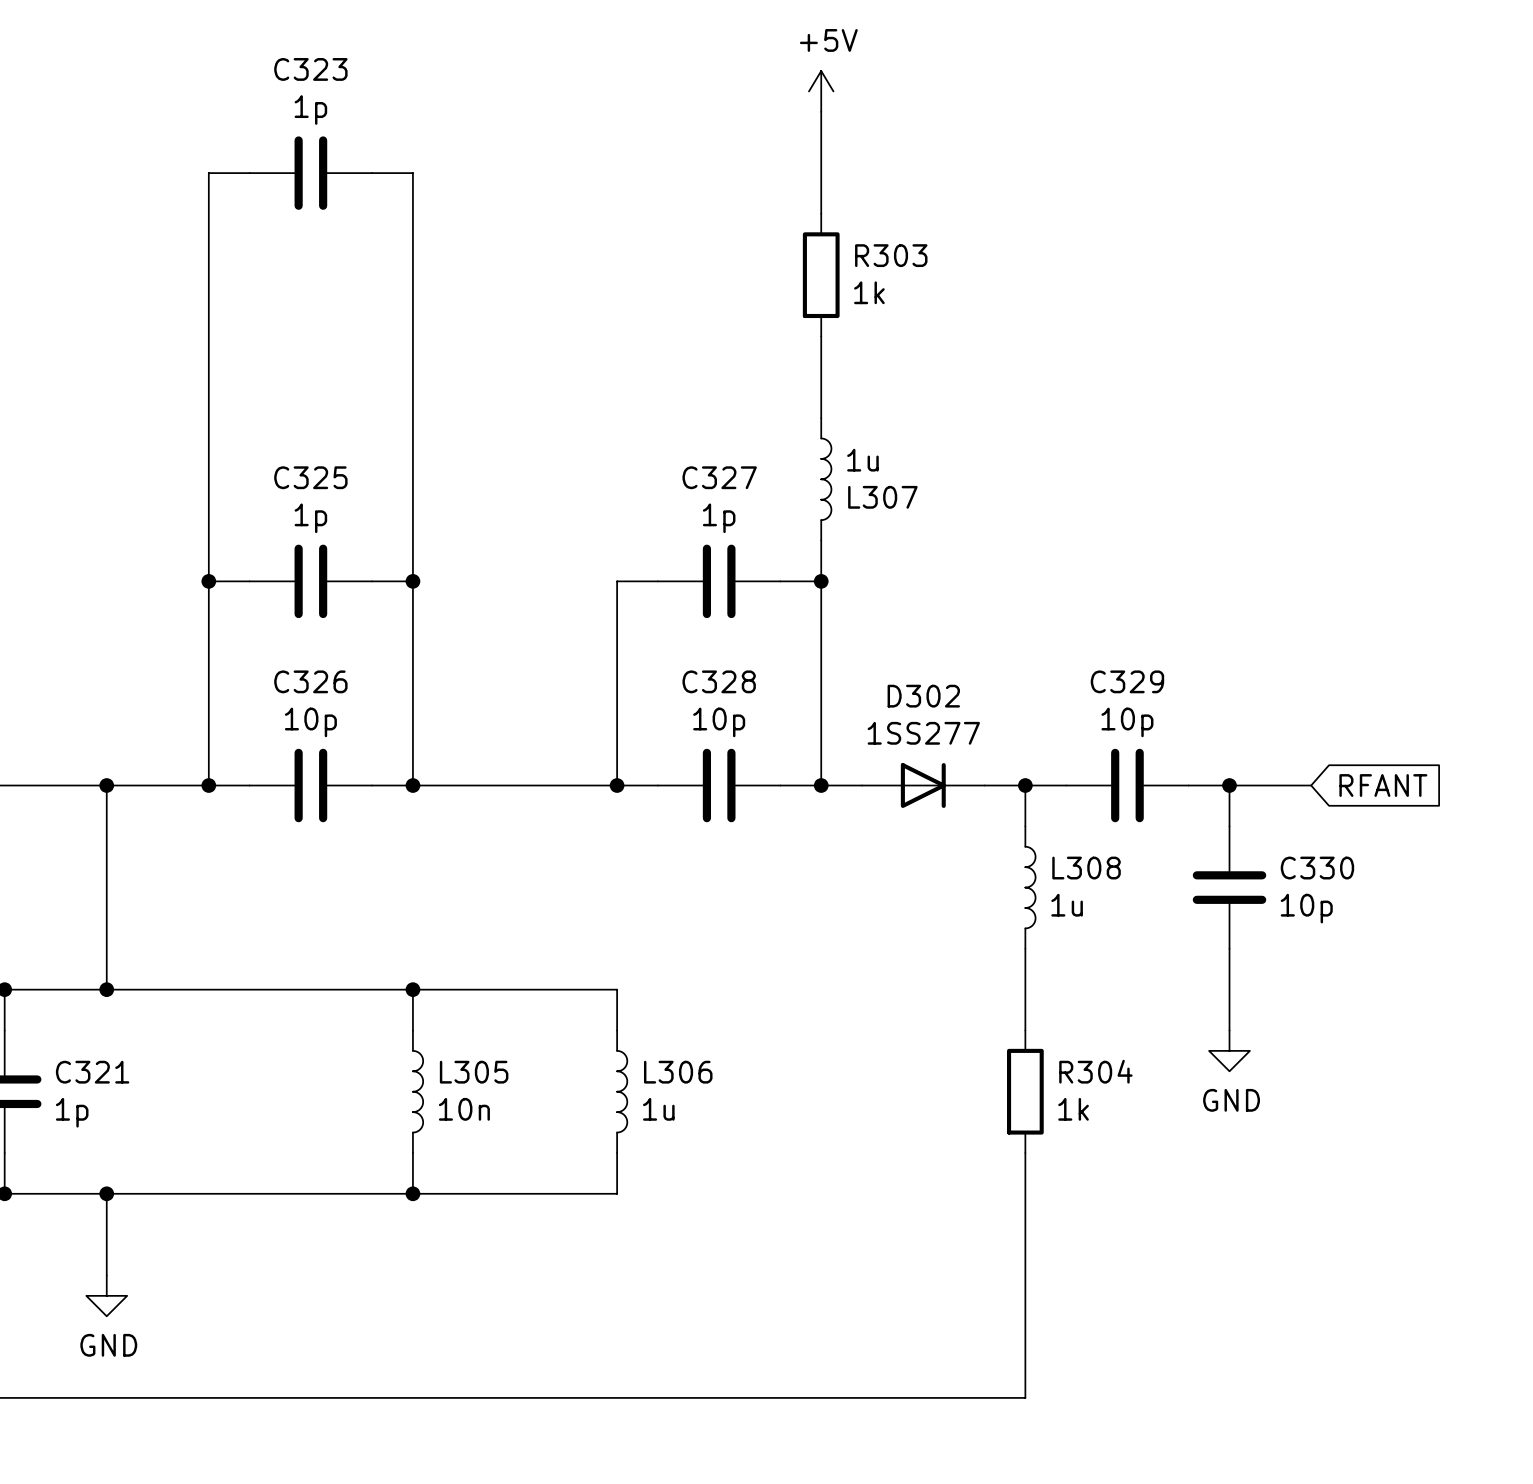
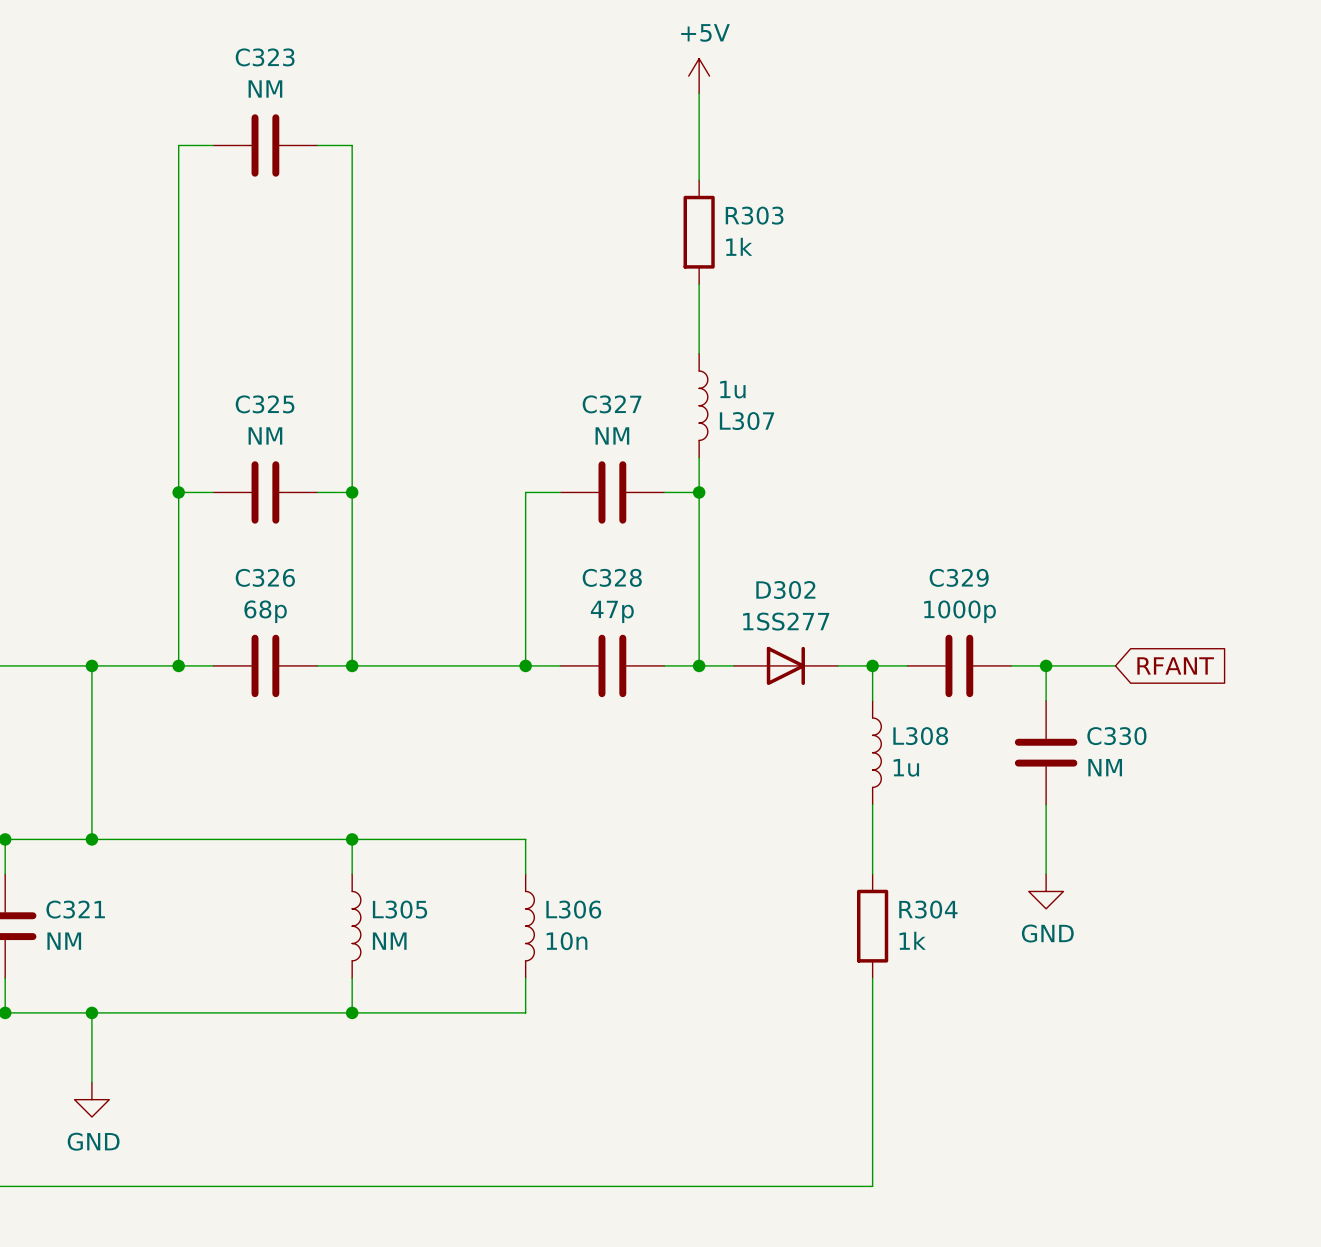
C323 value: 1p (310, 110) -> NM (265, 88)
C325 value: 1p (310, 518) -> NM (265, 435)
C327 value: 1p (719, 518) -> NM (612, 435)
C326 value: 10p (310, 722) -> 68p (265, 611)
C328 value: 10p (719, 722) -> 47p (612, 611)
C329 value: 10p (1127, 722) -> 1000p (960, 611)
C330 value: 10p (1306, 908) -> NM (1105, 767)
L305 value: 10n (464, 1109) -> NM (389, 941)
L306 value: 1u (658, 1109) -> 10n (567, 941)
C321 value: 1p (72, 1112) -> NM (64, 941)

